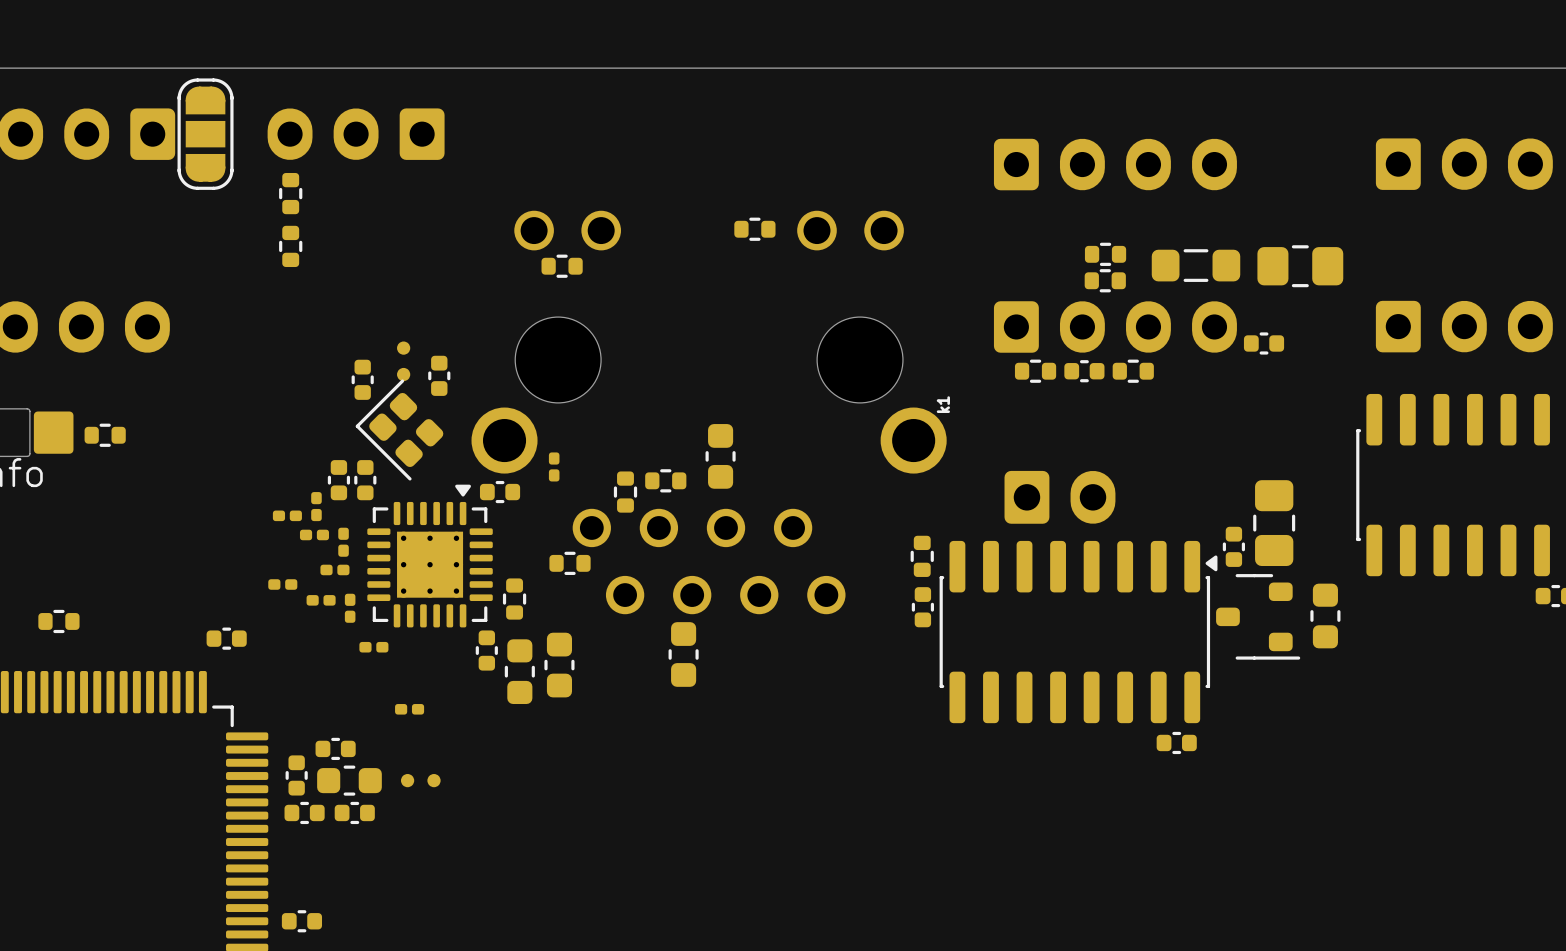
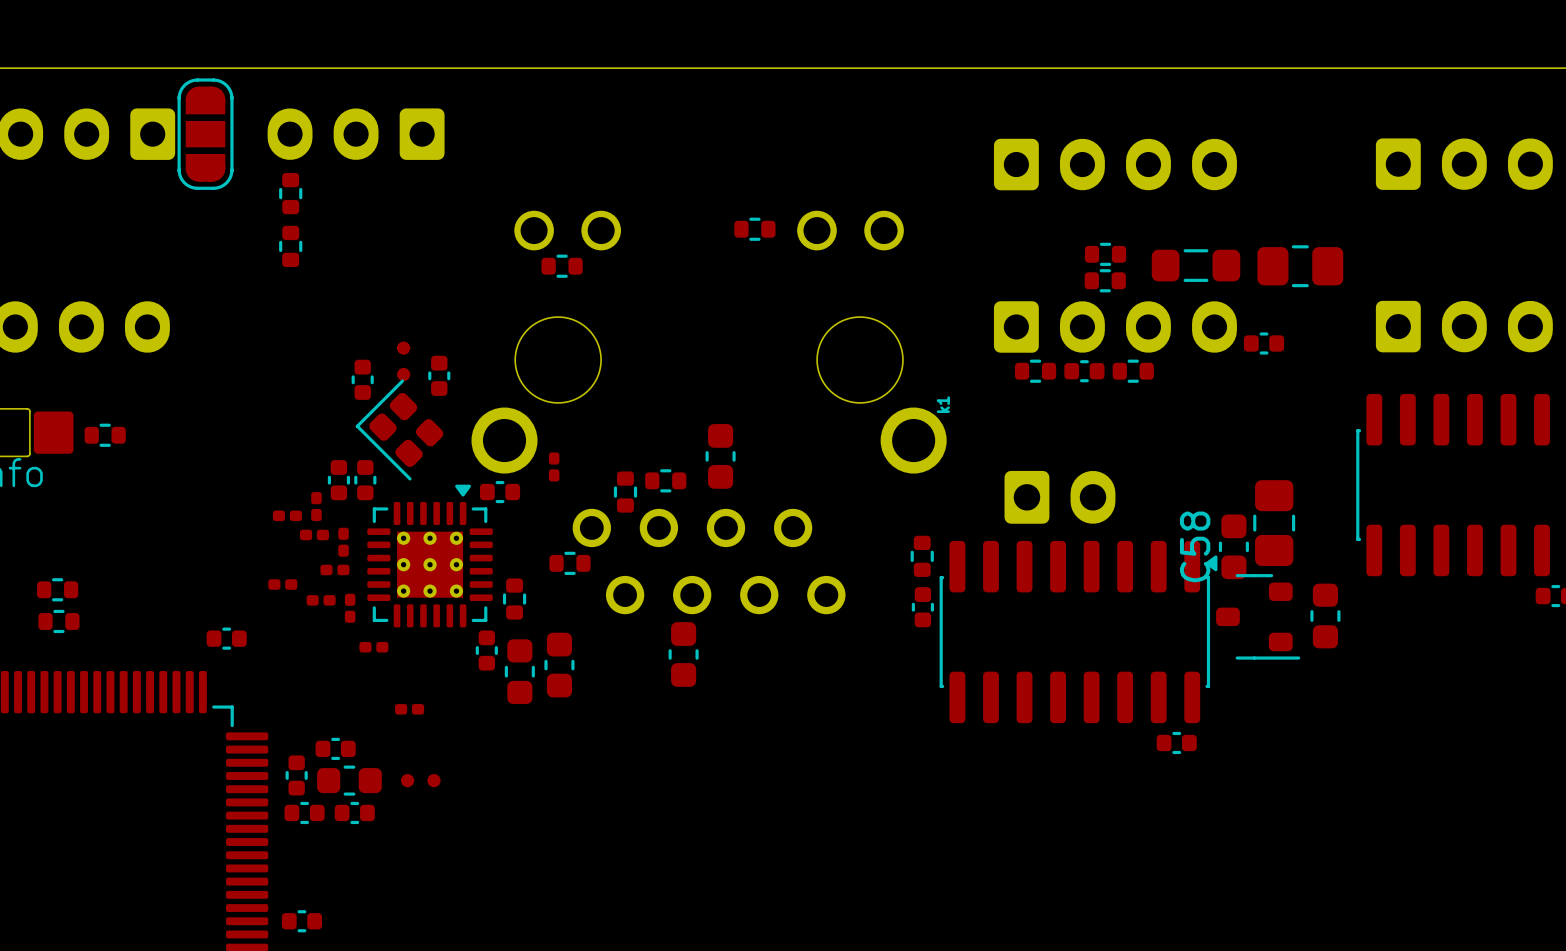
part: (1233, 546) -> none
C58: none -> (1233, 546)
part: none -> (57, 589)

